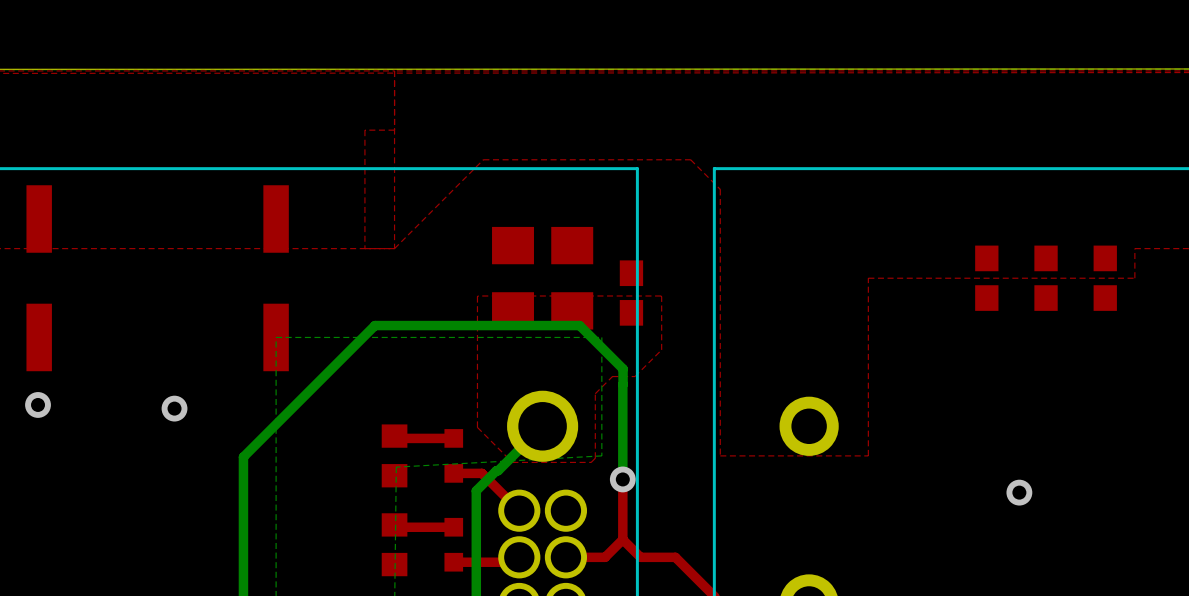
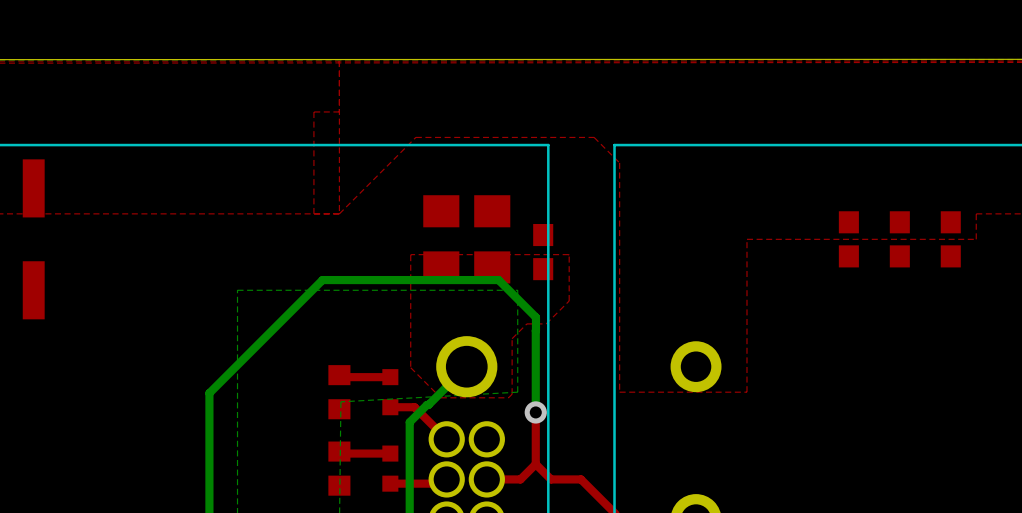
part: (276, 278) -> none
via: (38, 404) -> none
via: (174, 408) -> none
via: (1019, 492) -> none

